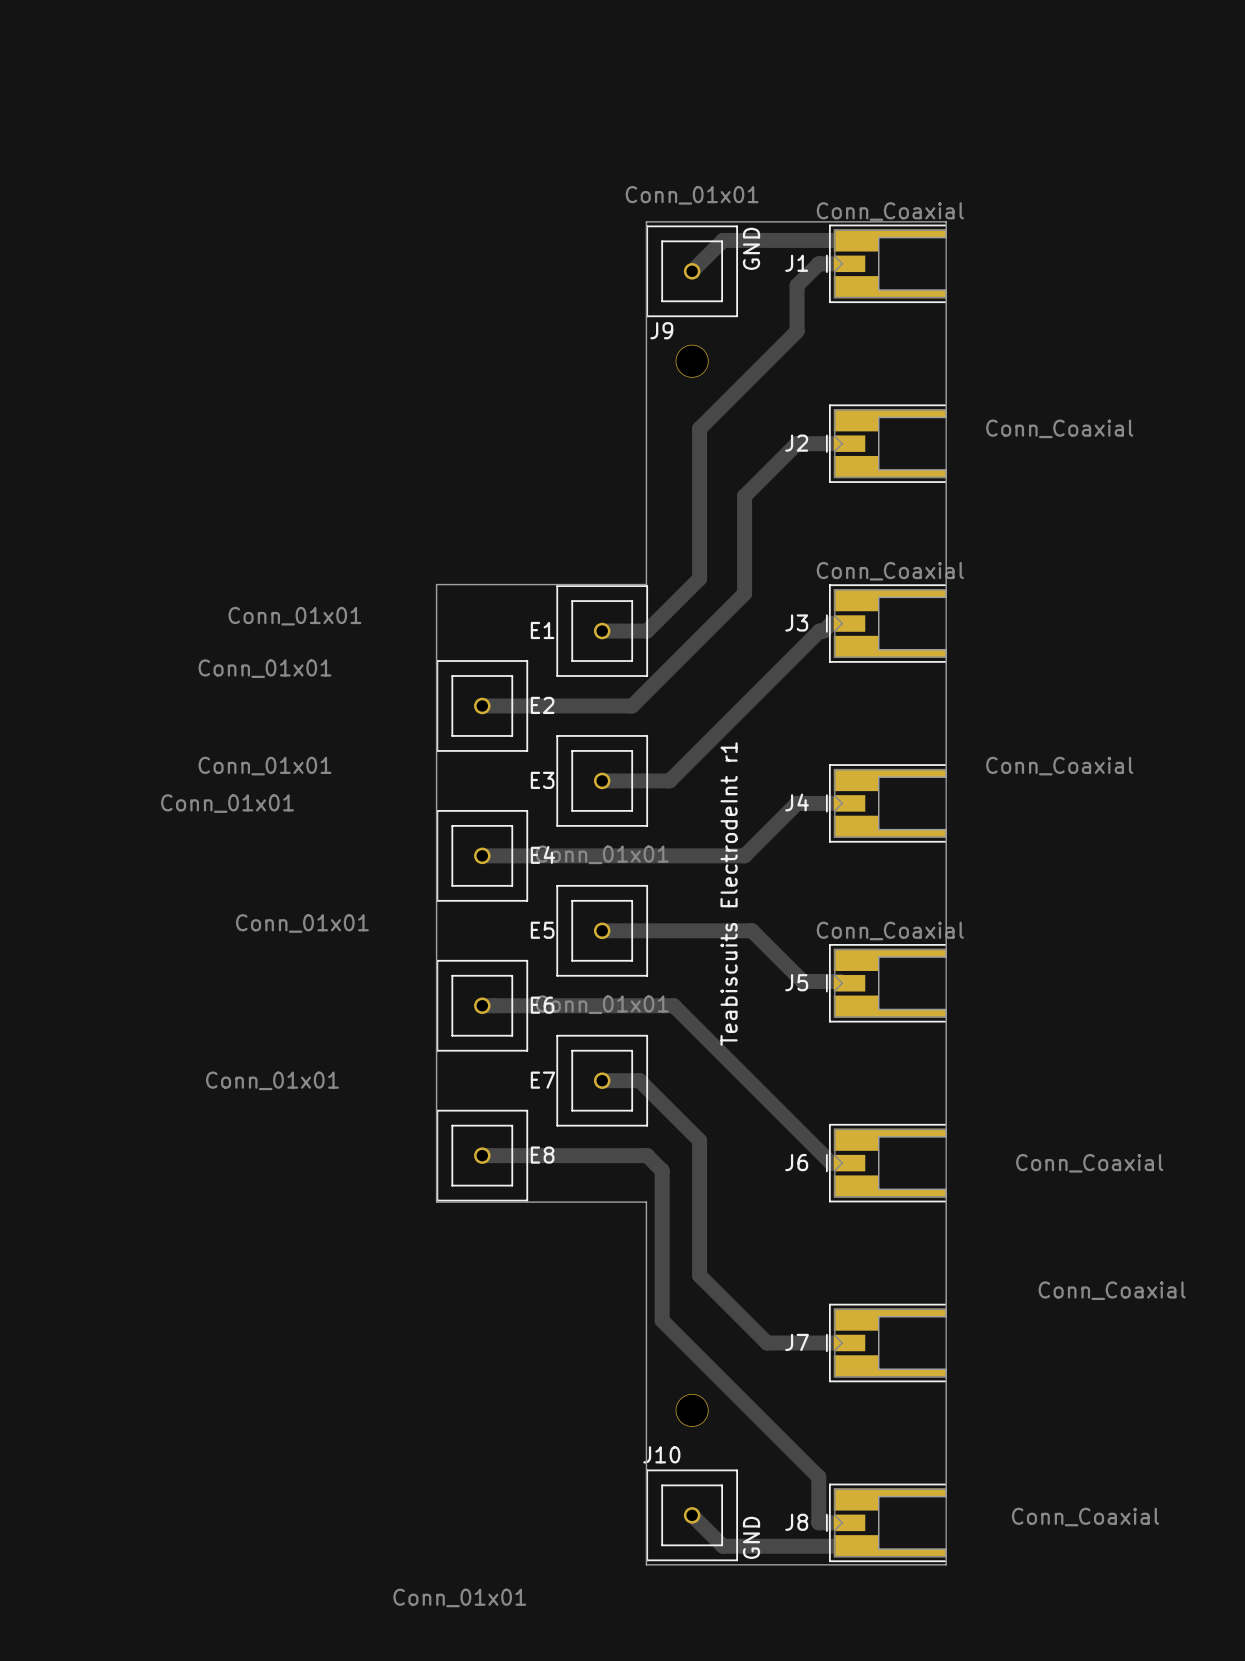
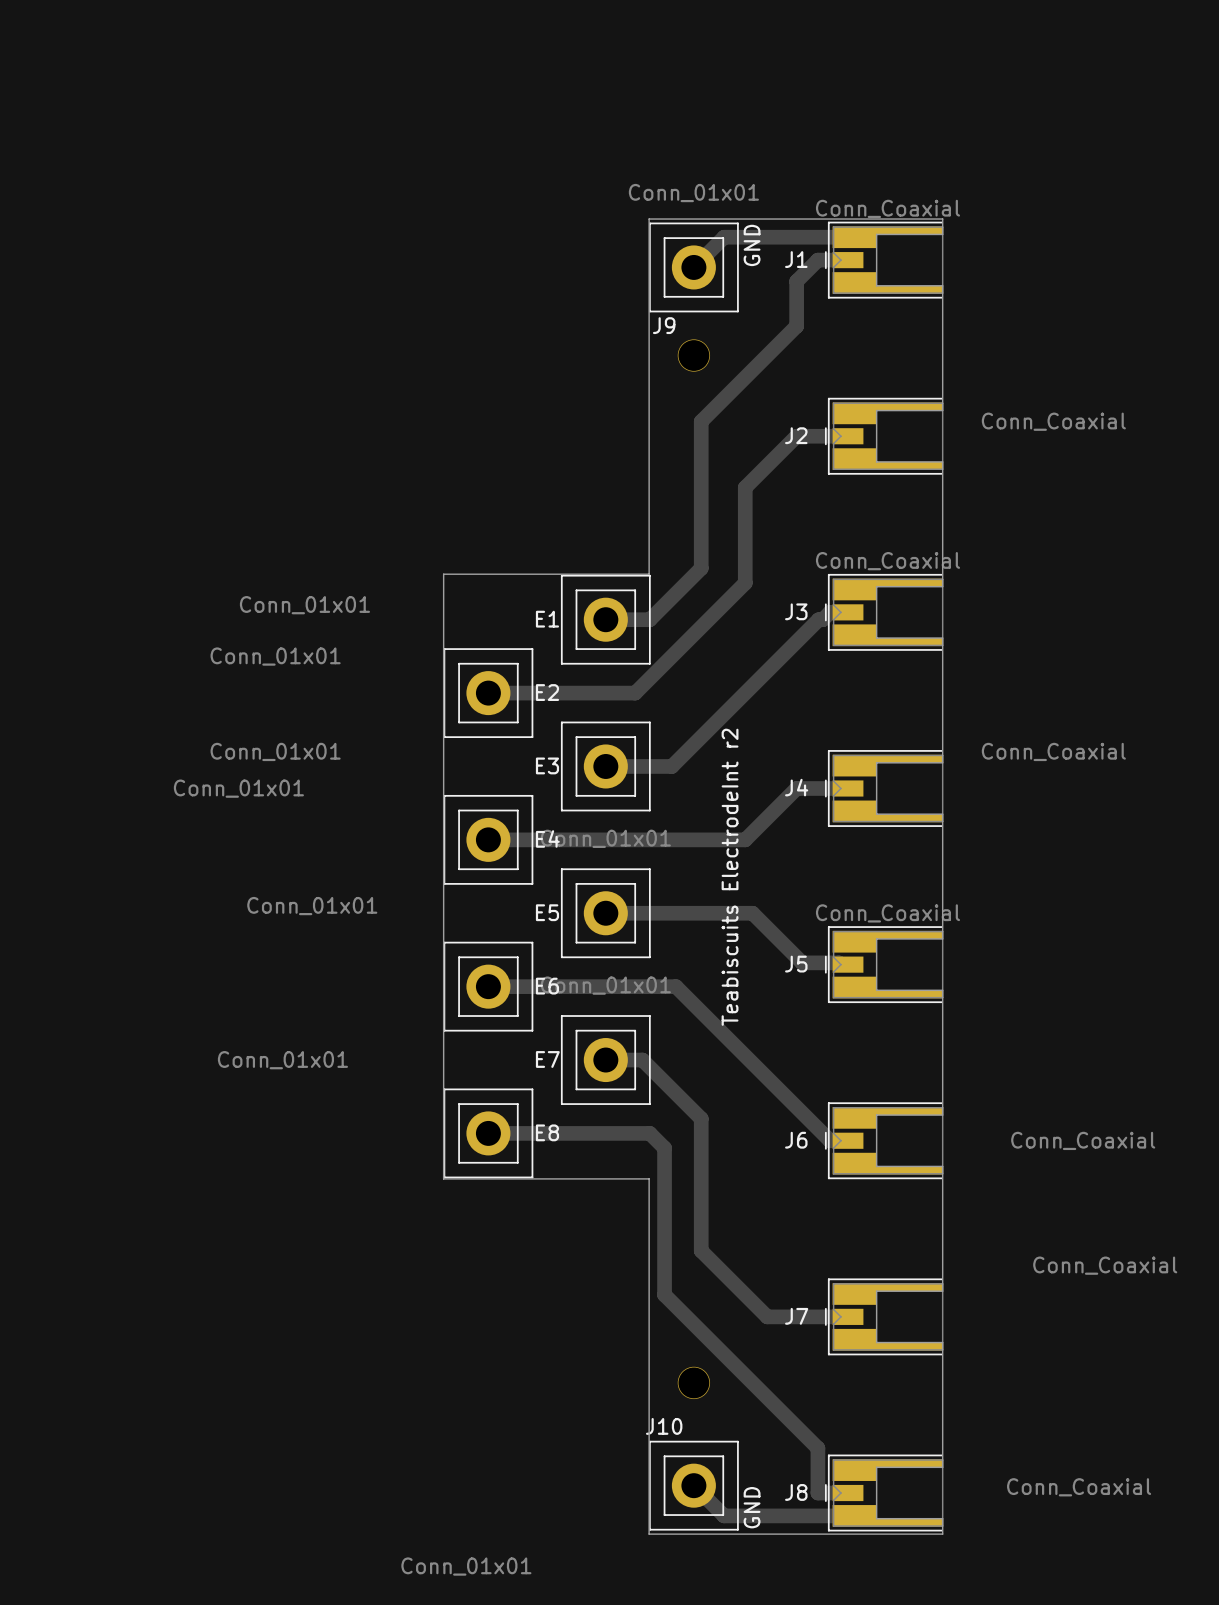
J9 footprint: [646, 225, 739, 318] -> [648, 222, 739, 313]
E1 footprint: [556, 585, 649, 677] -> [560, 574, 651, 665]
E2 footprint: [436, 660, 529, 752] -> [443, 648, 534, 739]
E3 footprint: [556, 735, 649, 827] -> [560, 721, 651, 812]
E4 footprint: [436, 810, 529, 902] -> [443, 794, 534, 885]
E5 footprint: [556, 884, 649, 977] -> [560, 868, 651, 959]
text: Teabiscuits ElectrodeInt r1 (729, 894) -> Teabiscuits ElectrodeInt r2 (730, 877)
E6 footprint: [436, 959, 529, 1052] -> [443, 941, 534, 1032]
E7 footprint: [556, 1034, 649, 1127] -> [560, 1015, 651, 1105]
E8 footprint: [436, 1109, 529, 1202] -> [443, 1088, 534, 1179]
J10 footprint: [646, 1469, 739, 1562] -> [648, 1440, 739, 1531]

